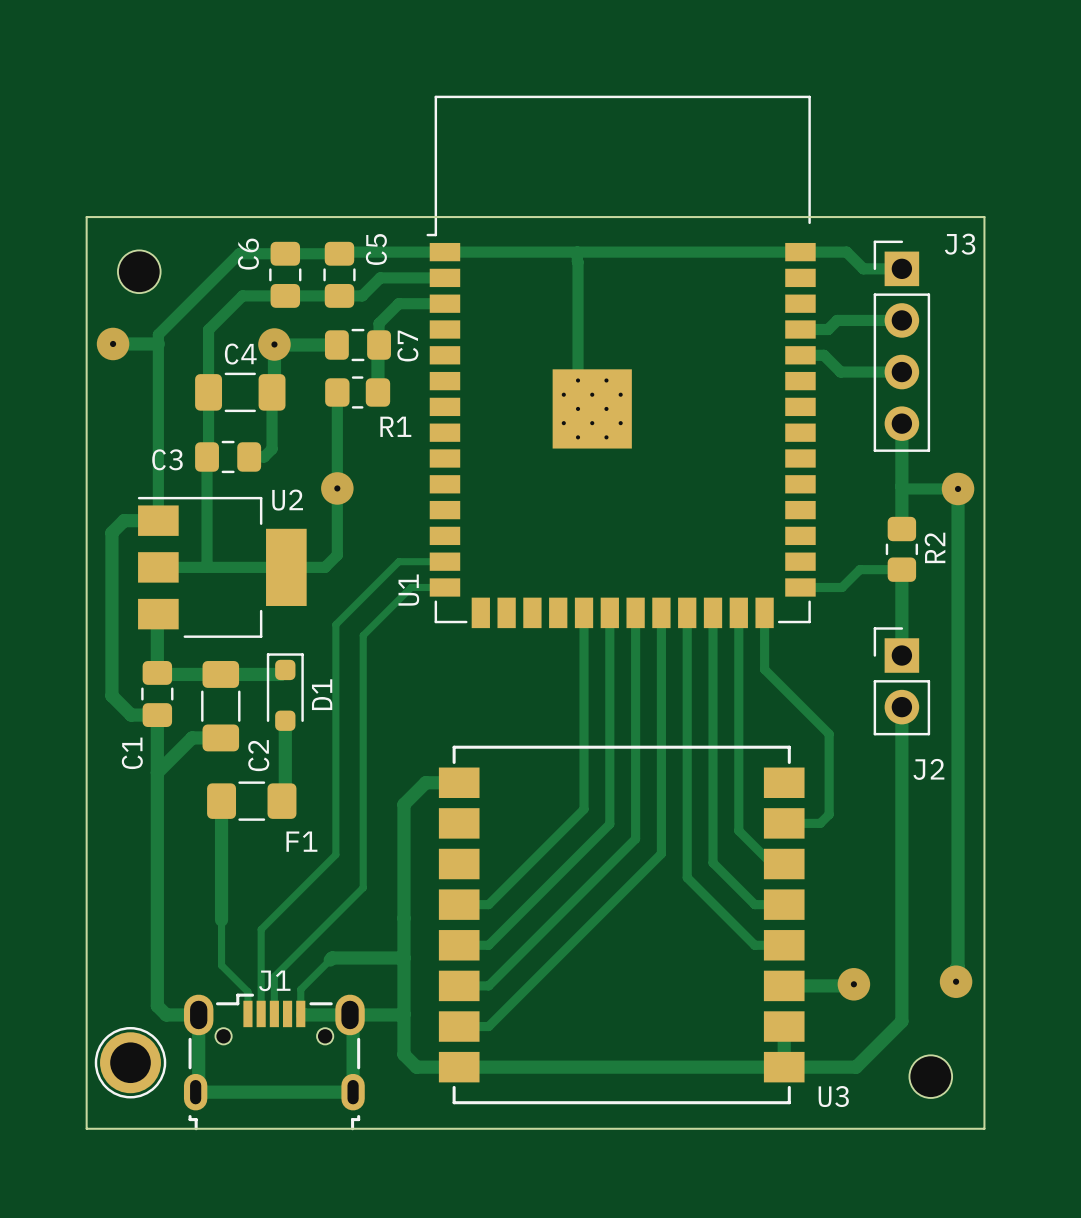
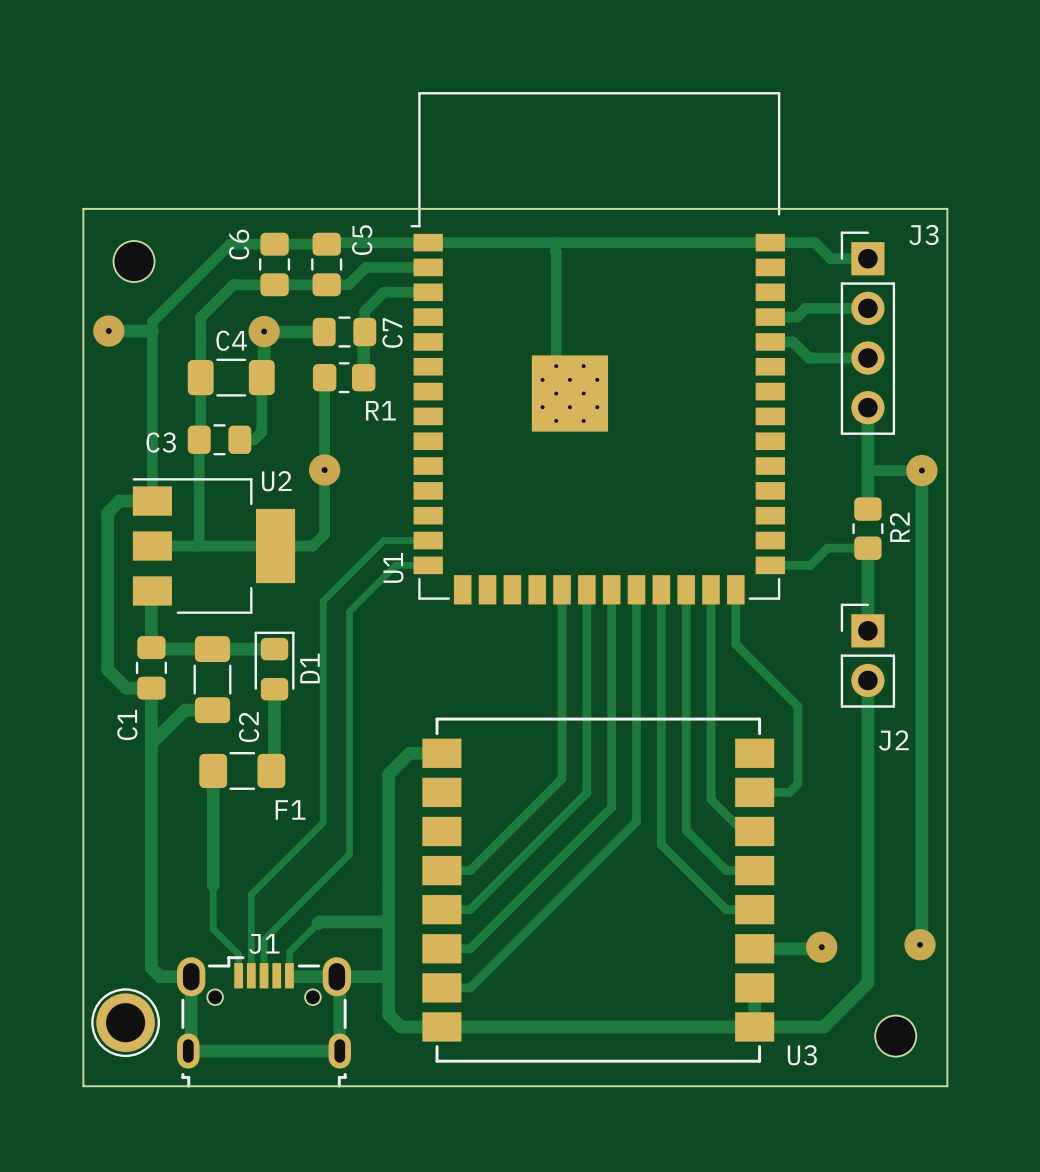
D1 footprint: [266, 653, 304, 731] -> [254, 631, 295, 701]

